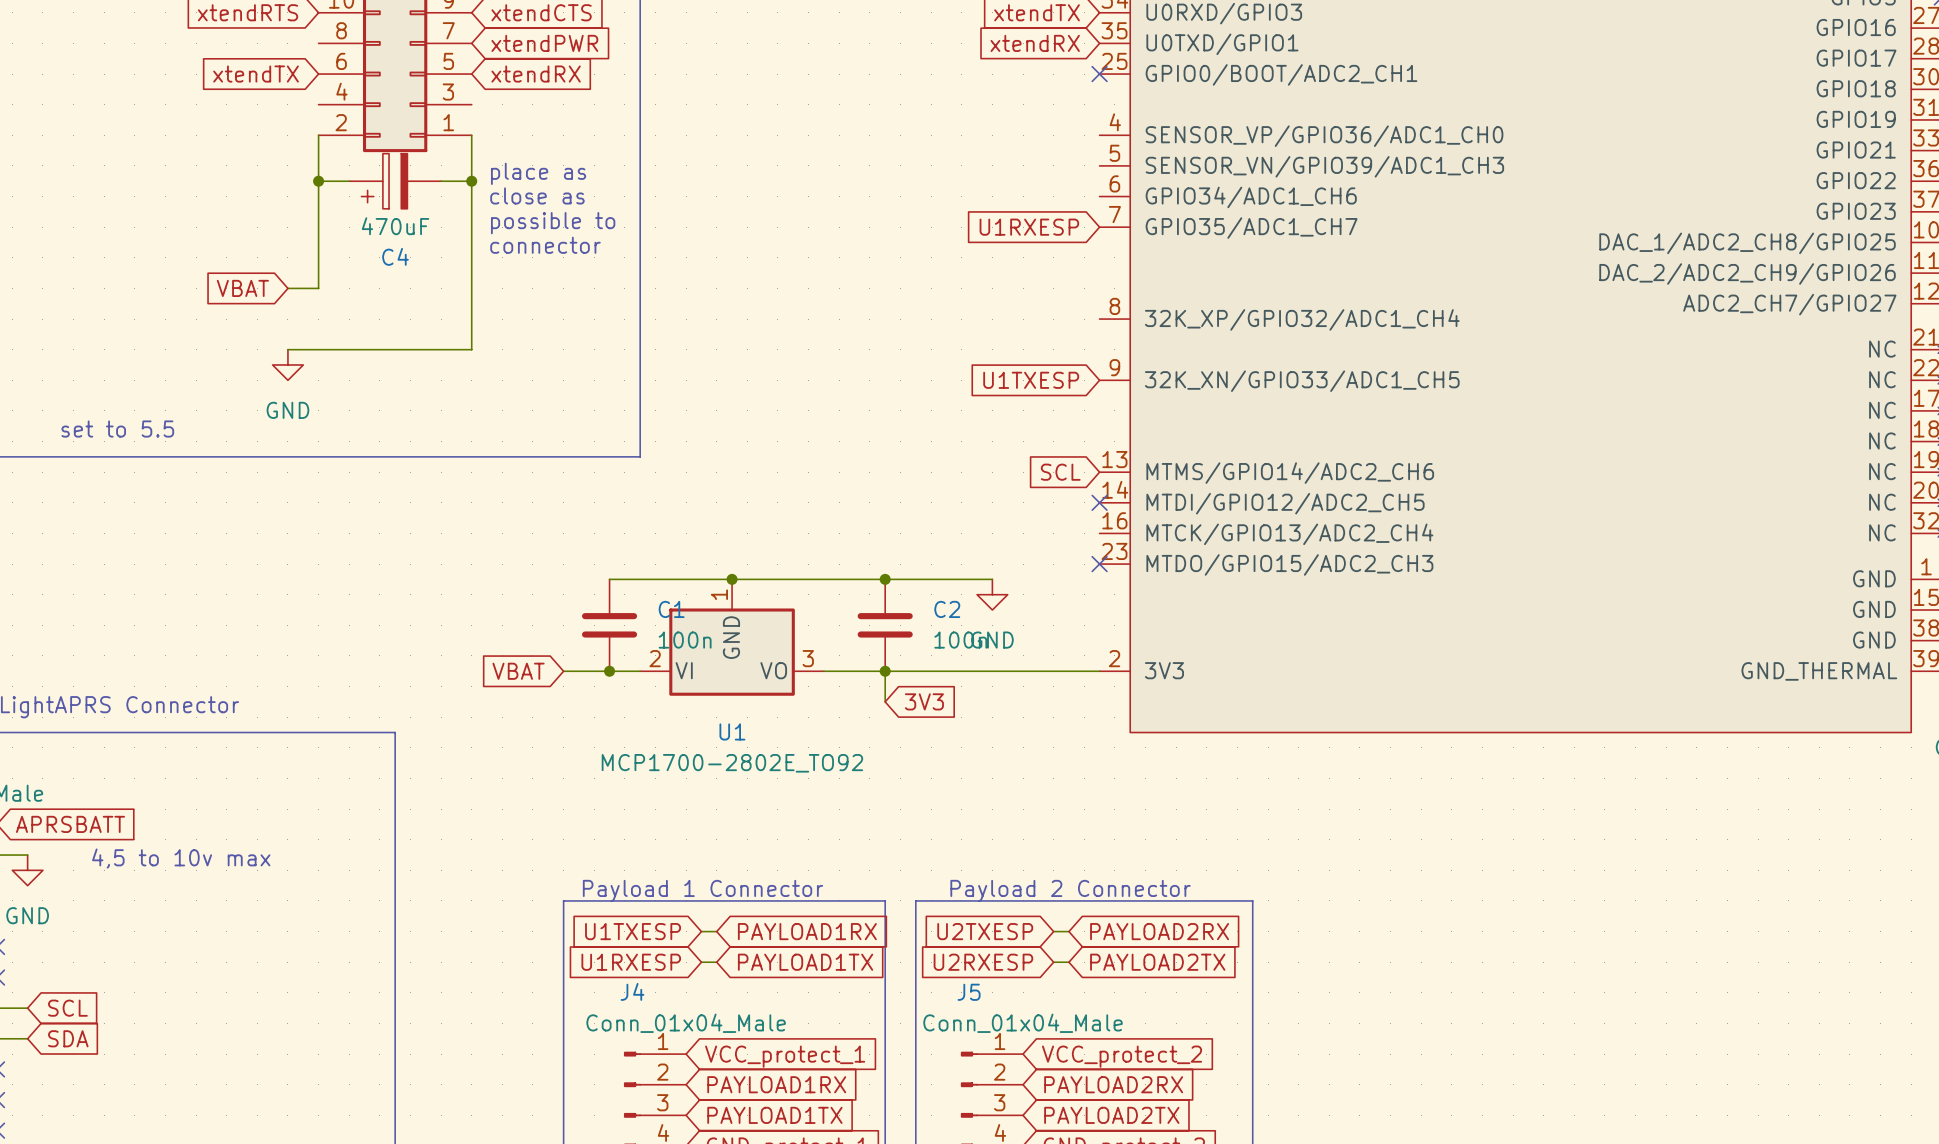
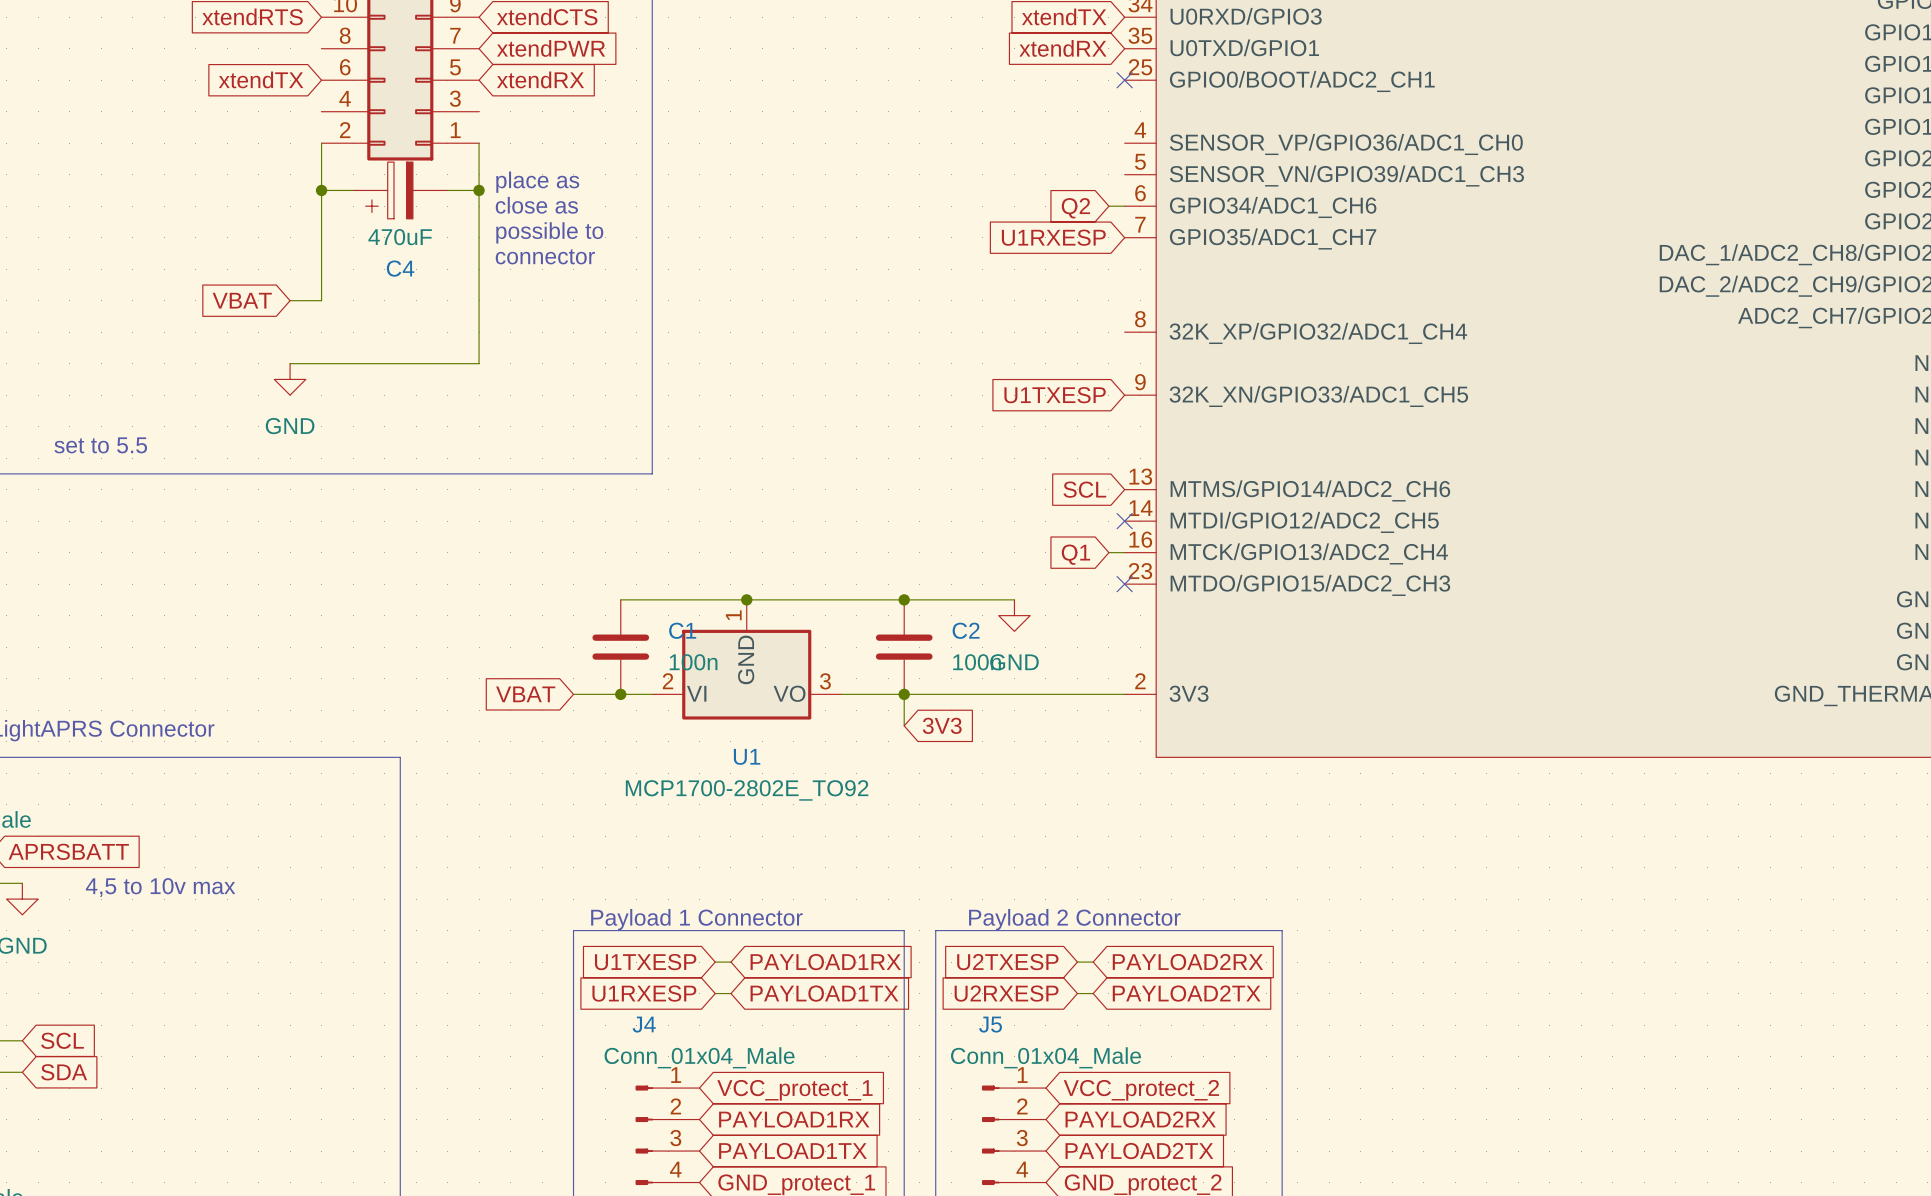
wire: none -> (1108, 206) (1124, 206)
global label: none -> Q2 (1075, 208)
wire: none -> (1108, 552) (1124, 552)
global label: none -> Q1 (1075, 554)

